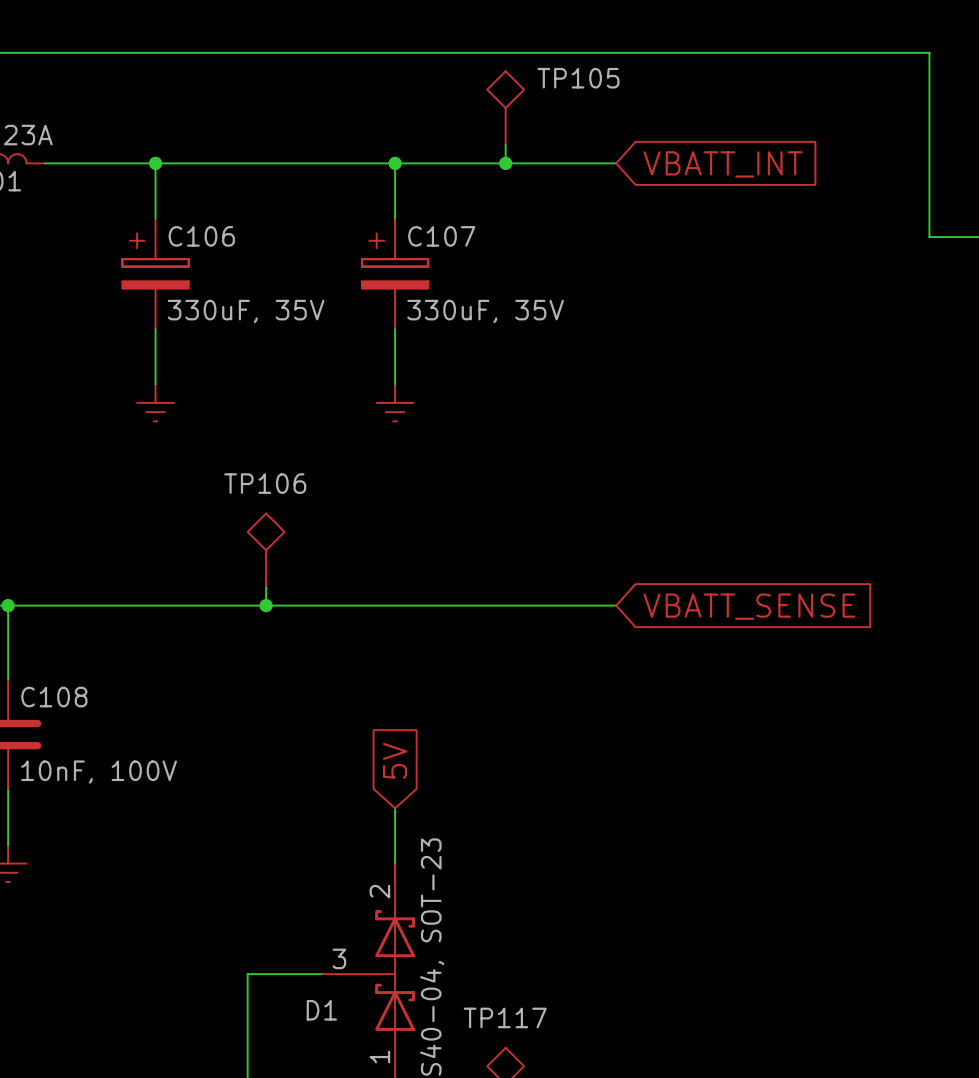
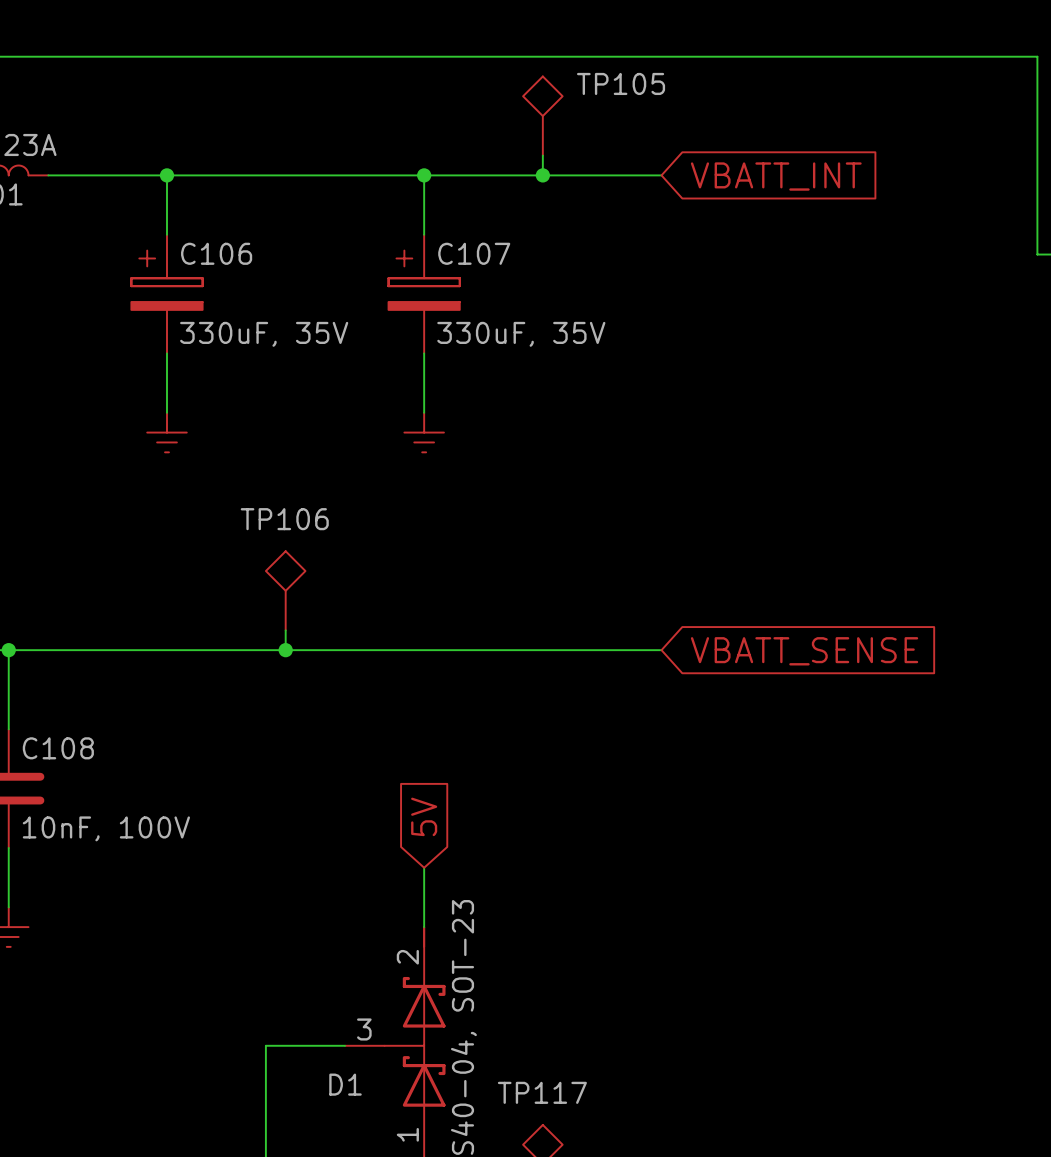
wire: (929, 52) (929, 237) (966, 237) -> (997, 56) (1037, 56) (1037, 254)

